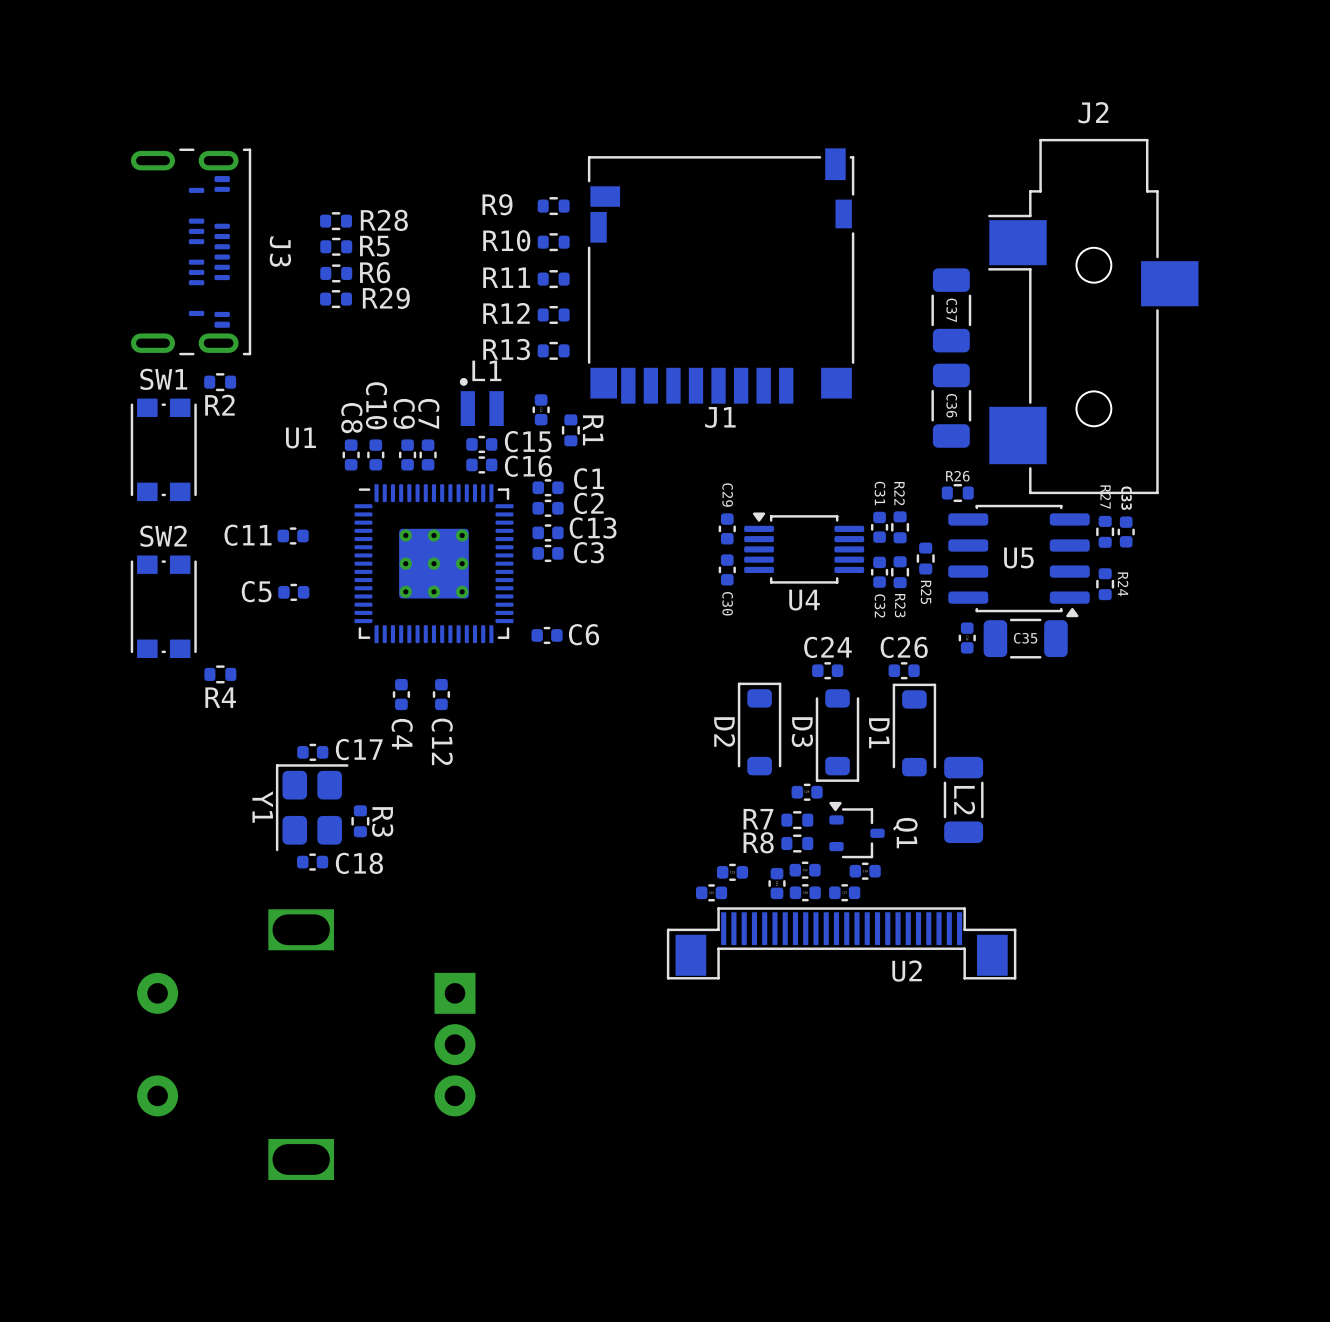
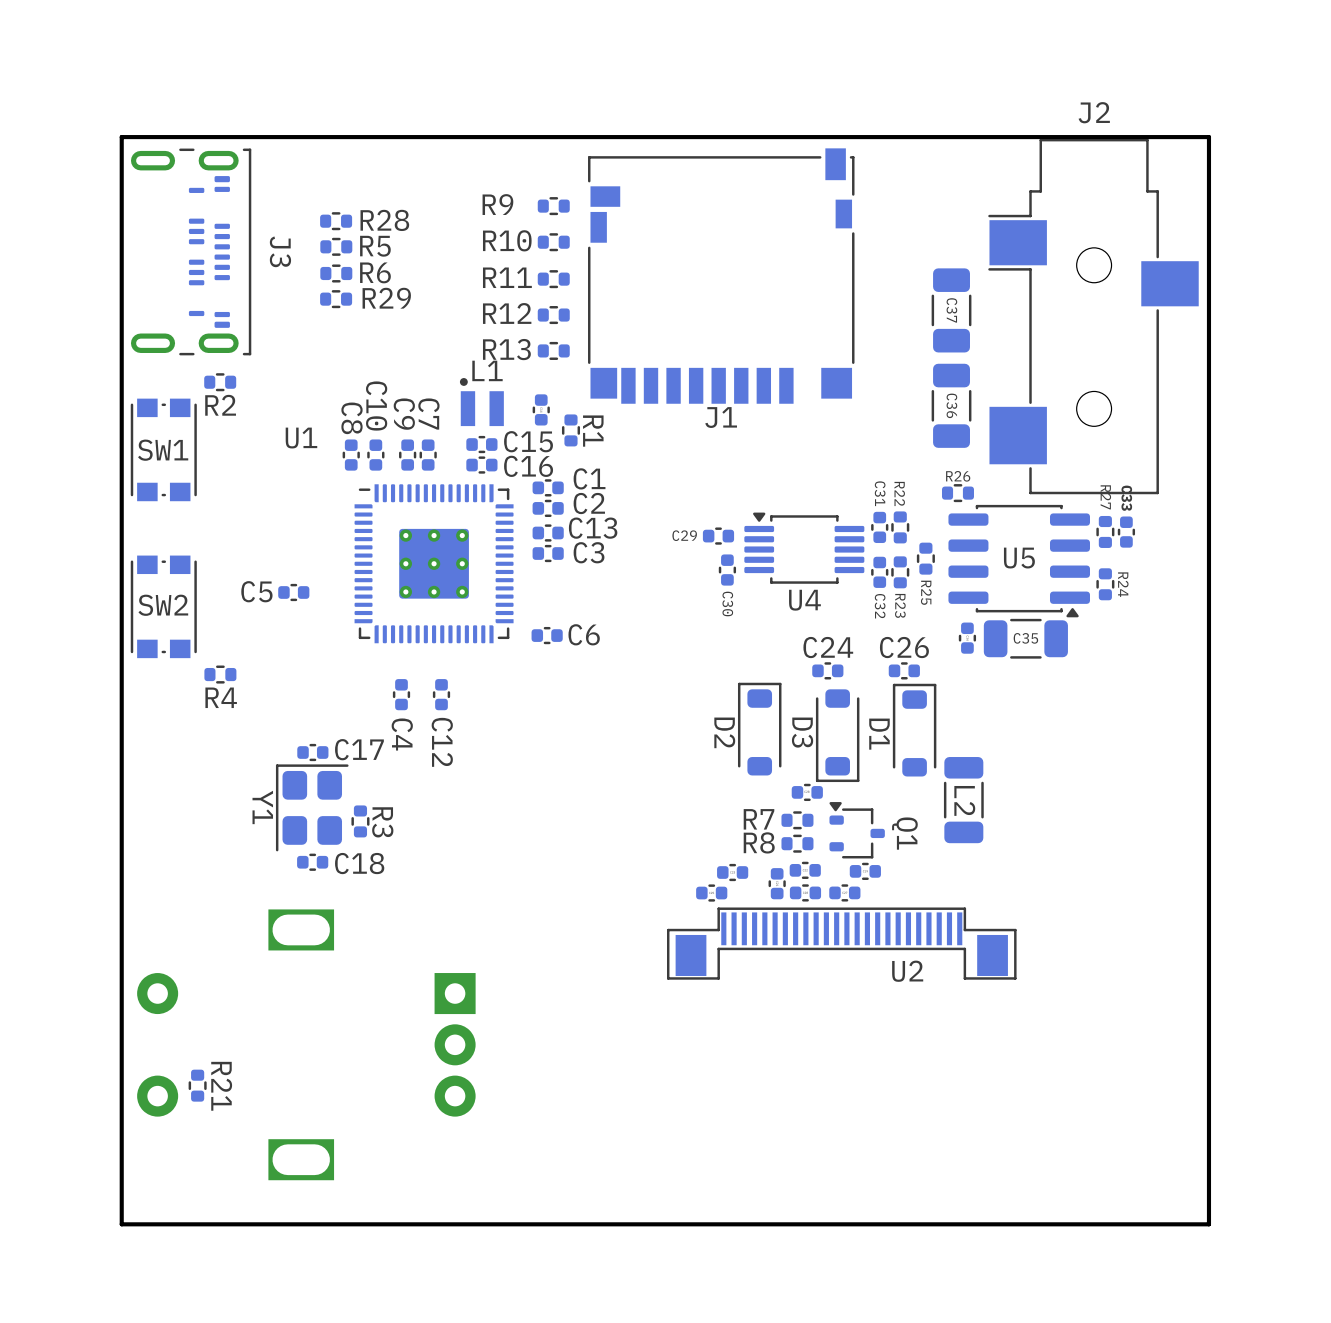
board edge: none -> (1208, 137) (121, 137) (121, 1224) (1208, 1224) (1208, 137)
SW1 name position: SW1 (163, 379) -> SW1 (163, 450)
C29 name position: C29 (727, 495) -> C29 (684, 535)
C29 rotation: 0° (727, 528) -> 90° clockwise (718, 536)
C11: (293, 535) -> none
SW2 name position: SW2 (163, 536) -> SW2 (163, 605)
R21: none -> (197, 1085)

